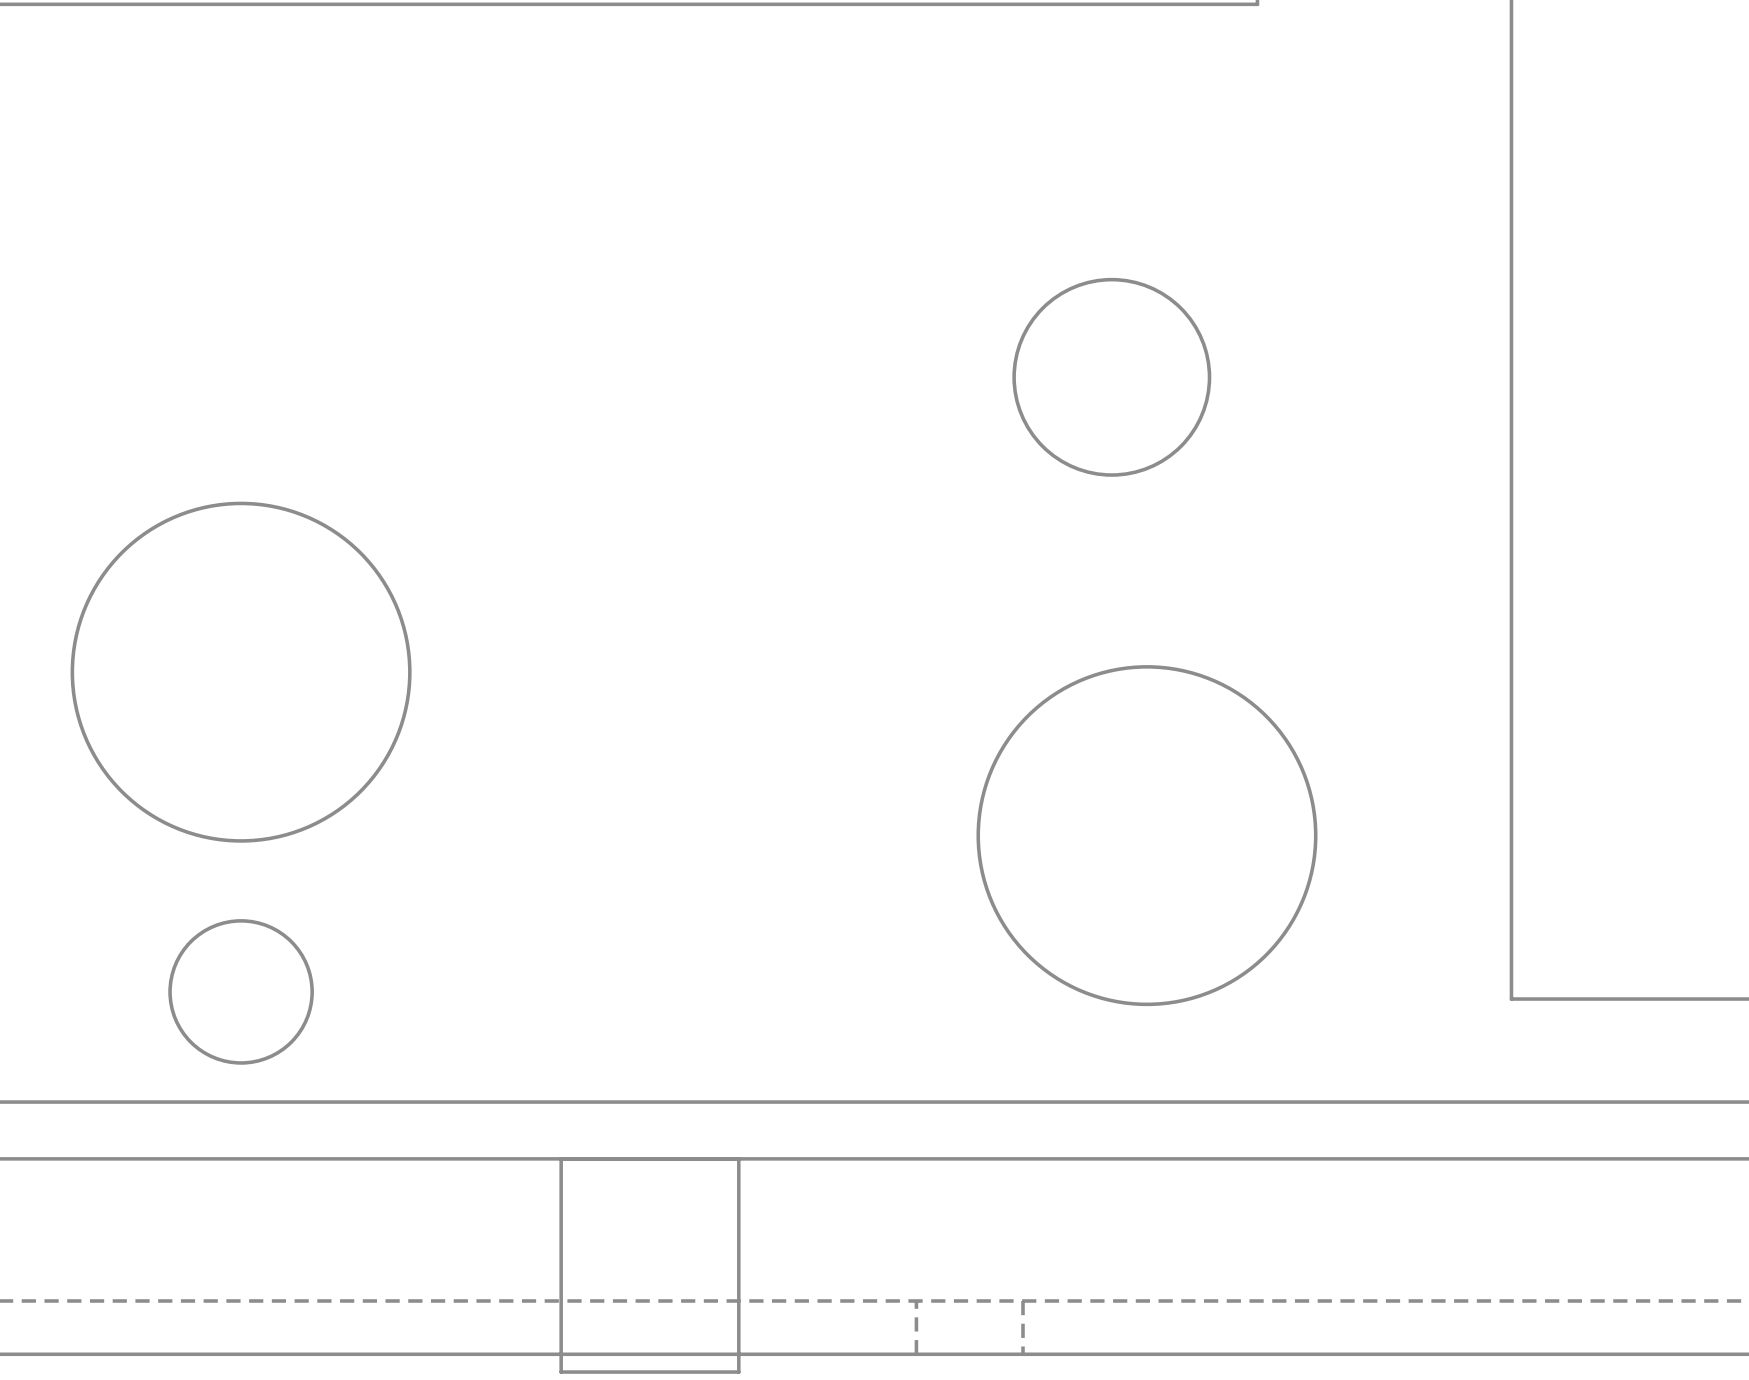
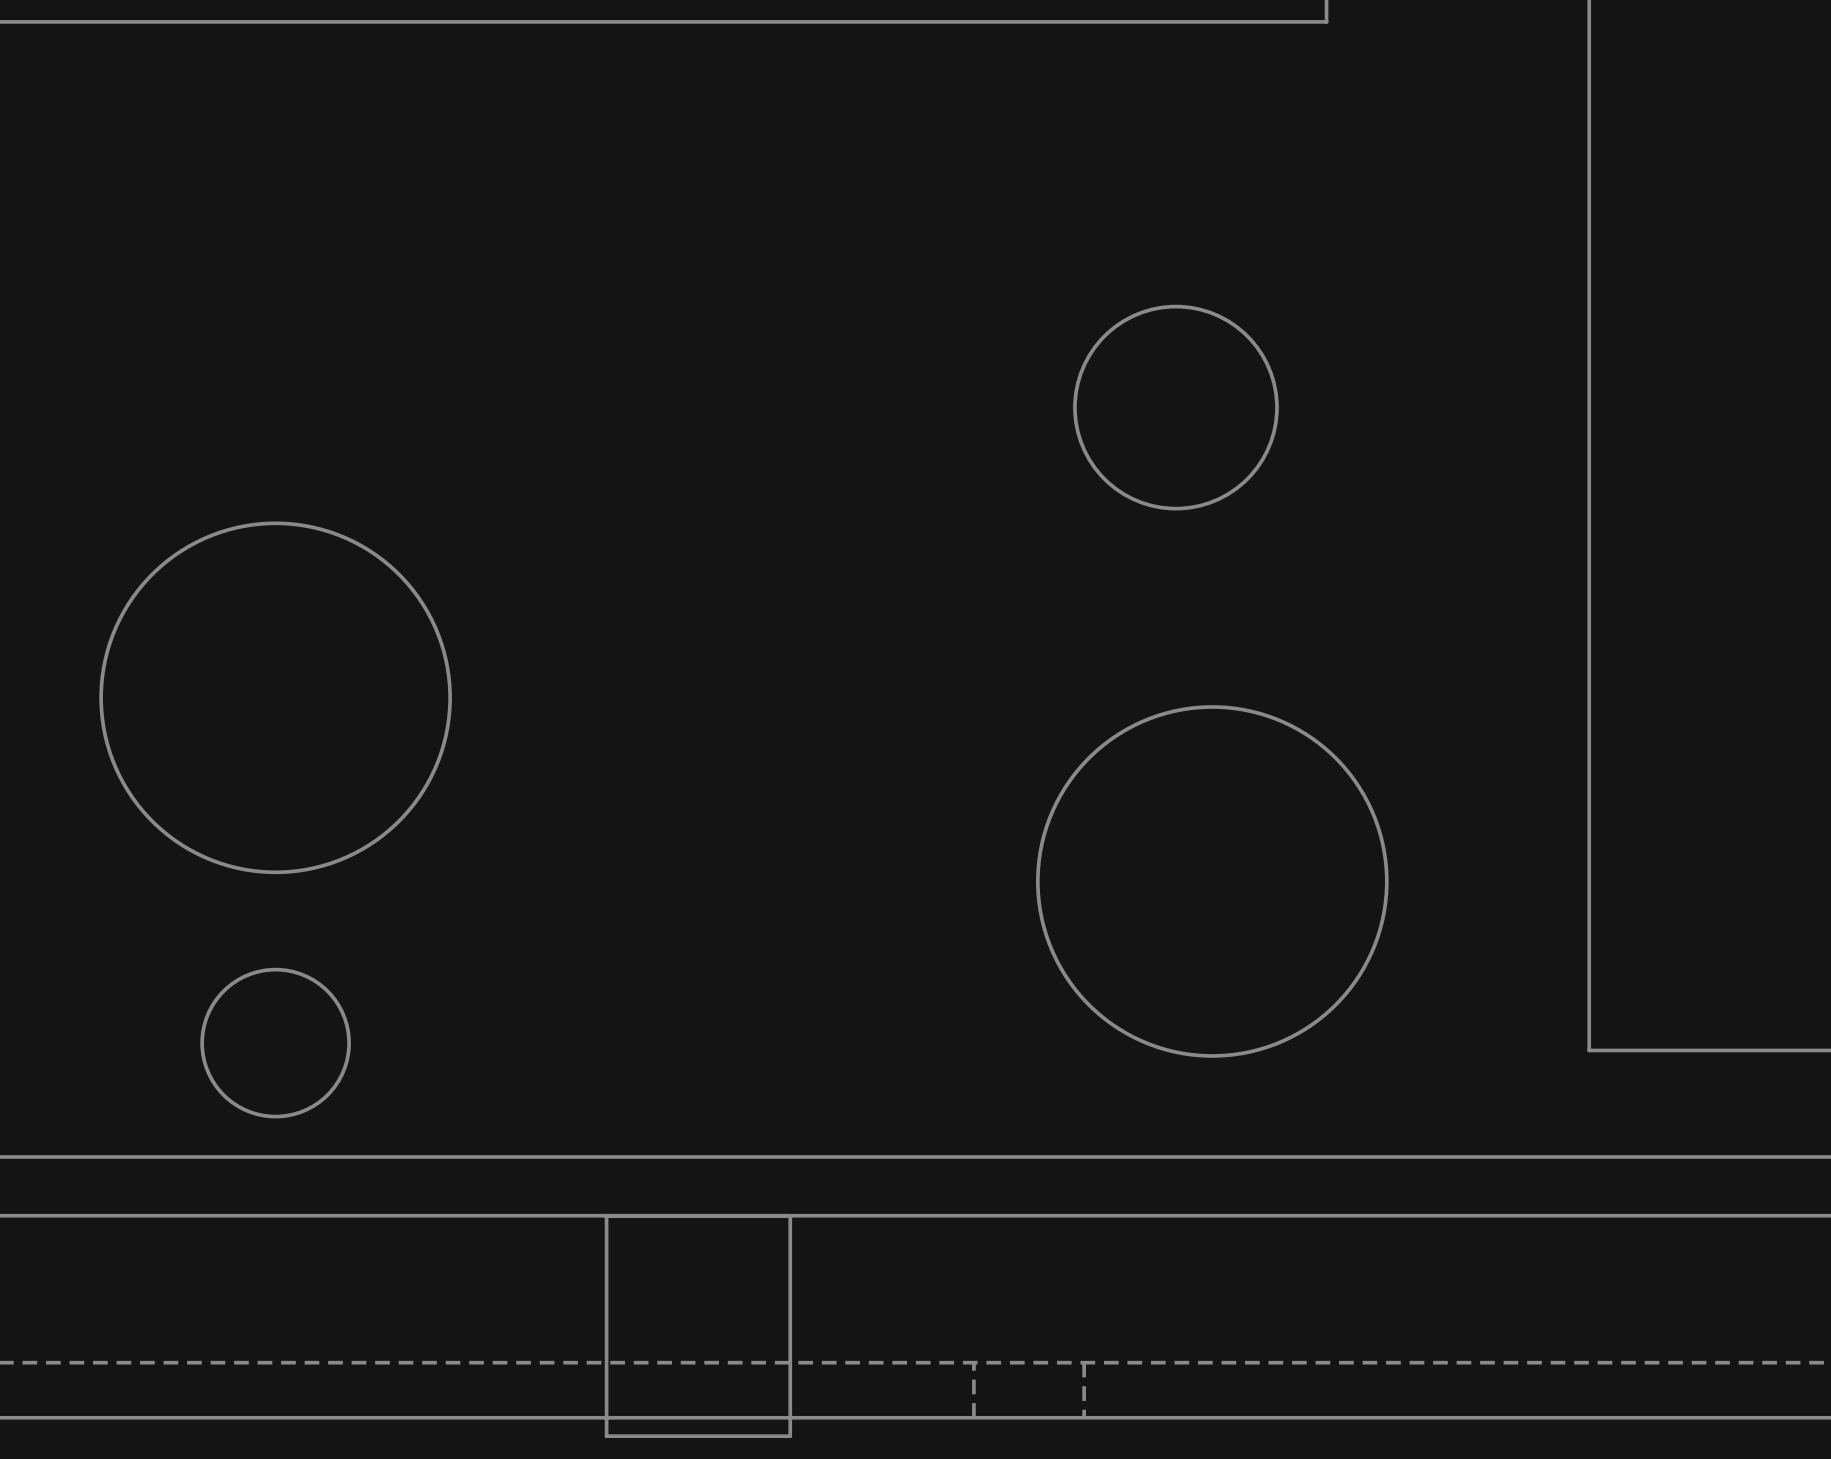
drawing position: (241, 672) -> (275, 697)

